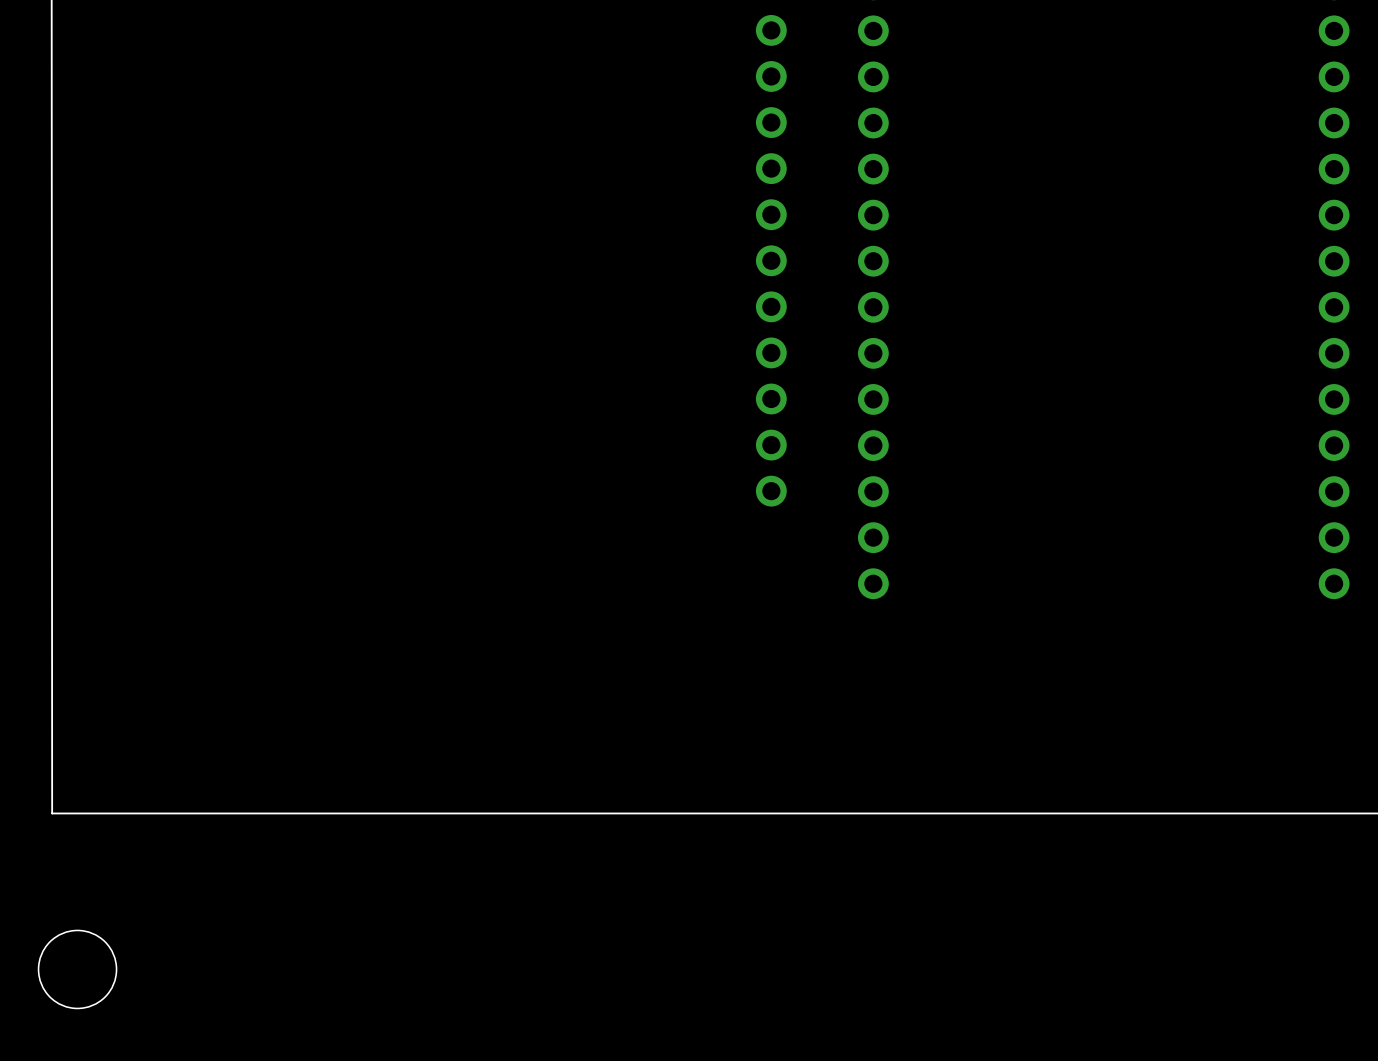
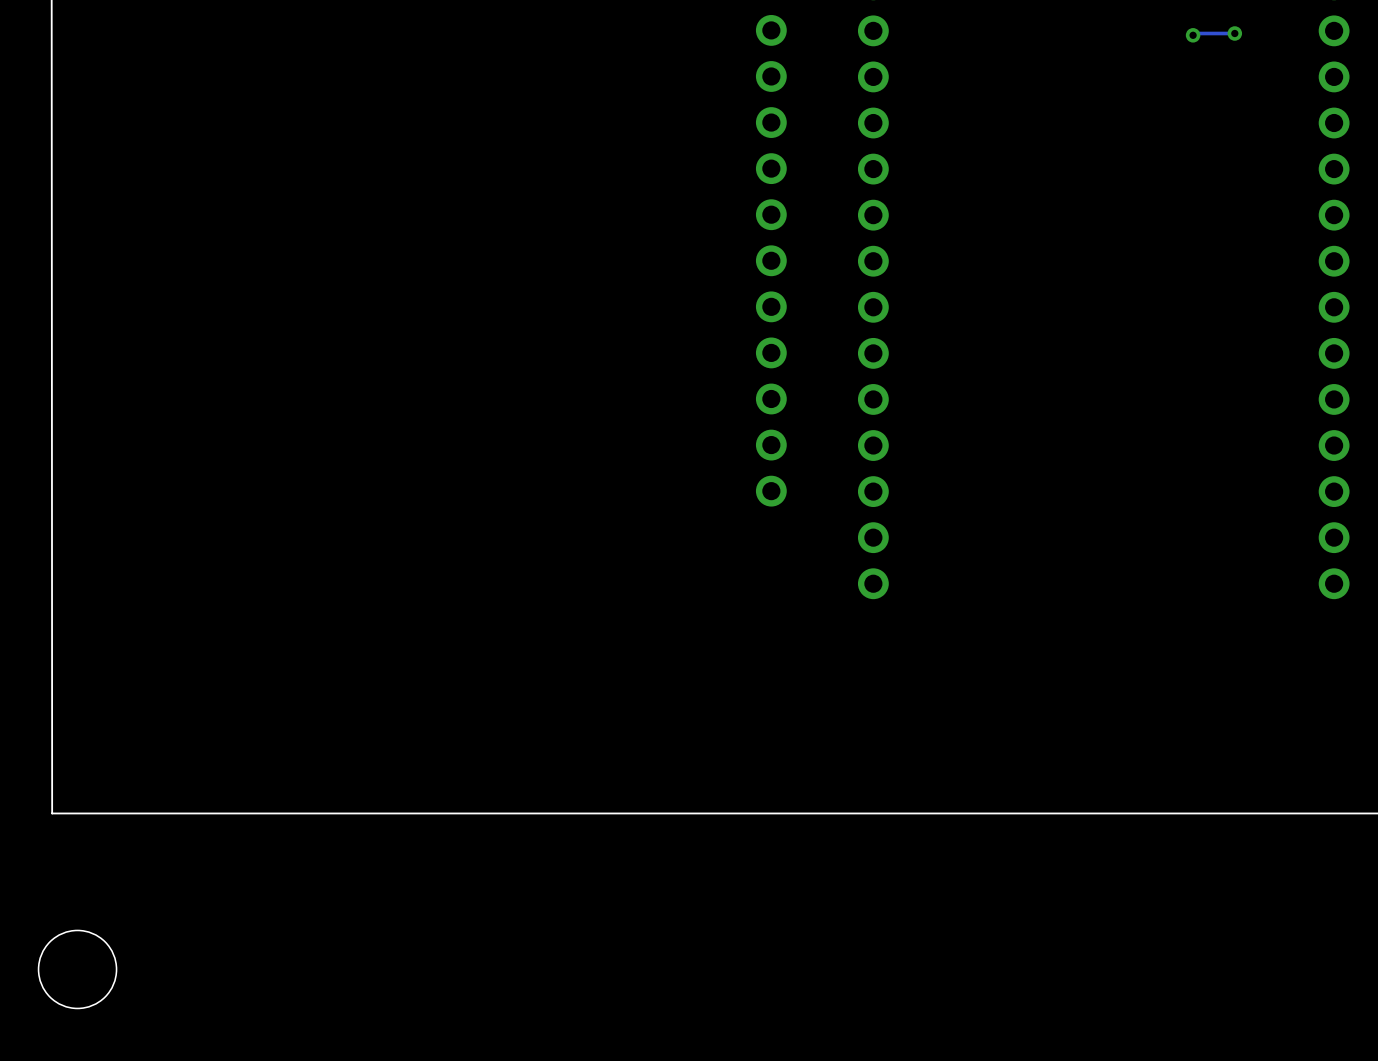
track: none -> (1234, 33) (1194, 33) (1193, 35)
via: none -> (1234, 33)
via: none -> (1193, 35)

